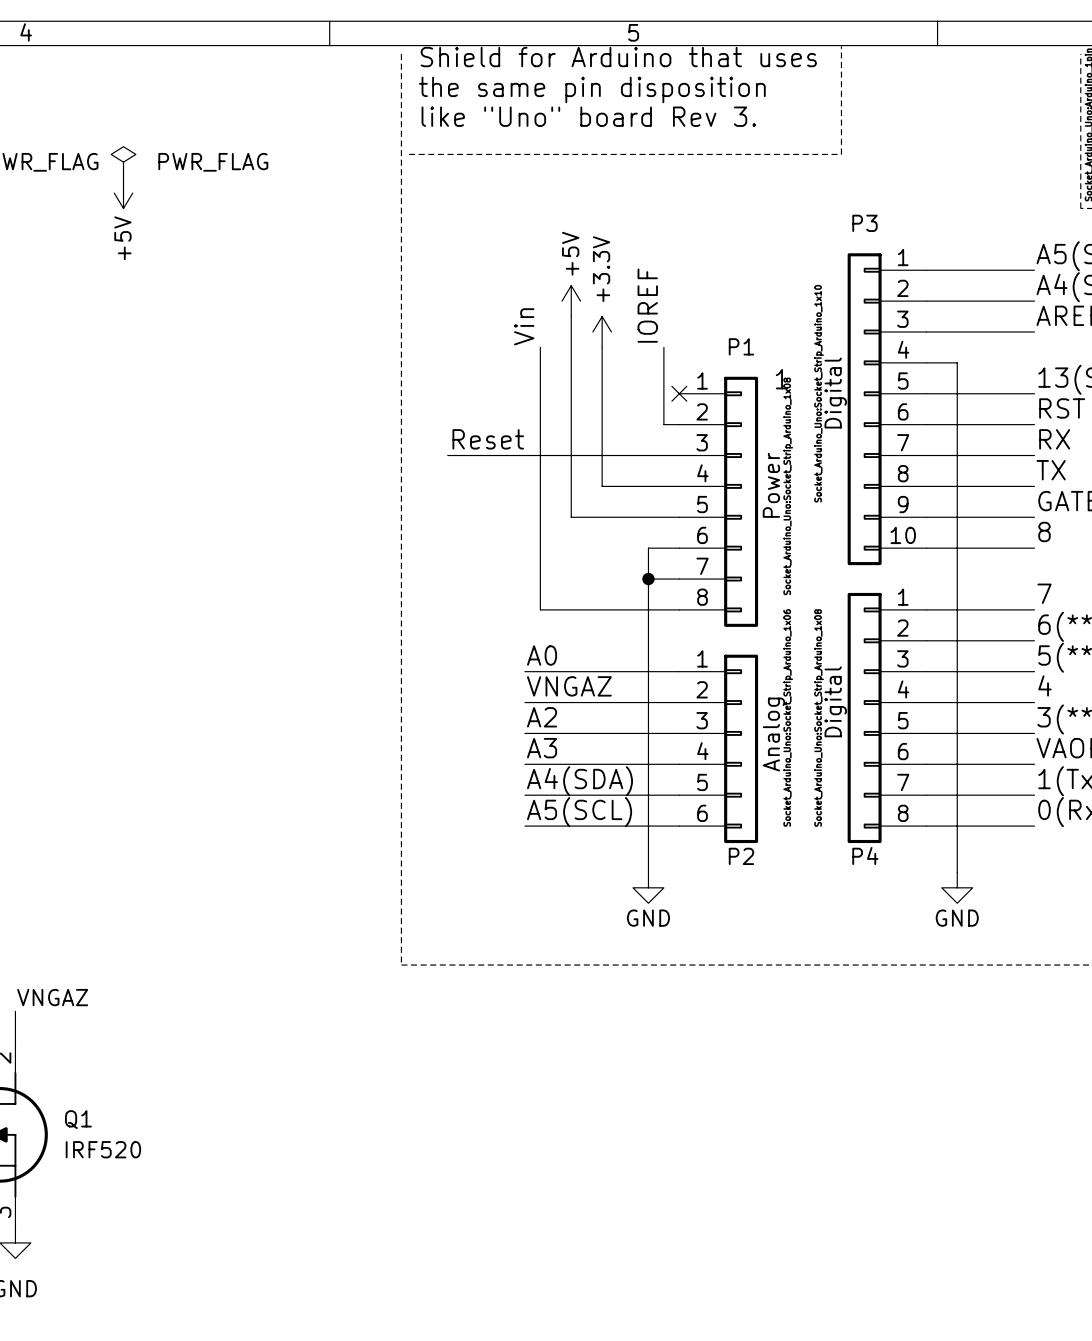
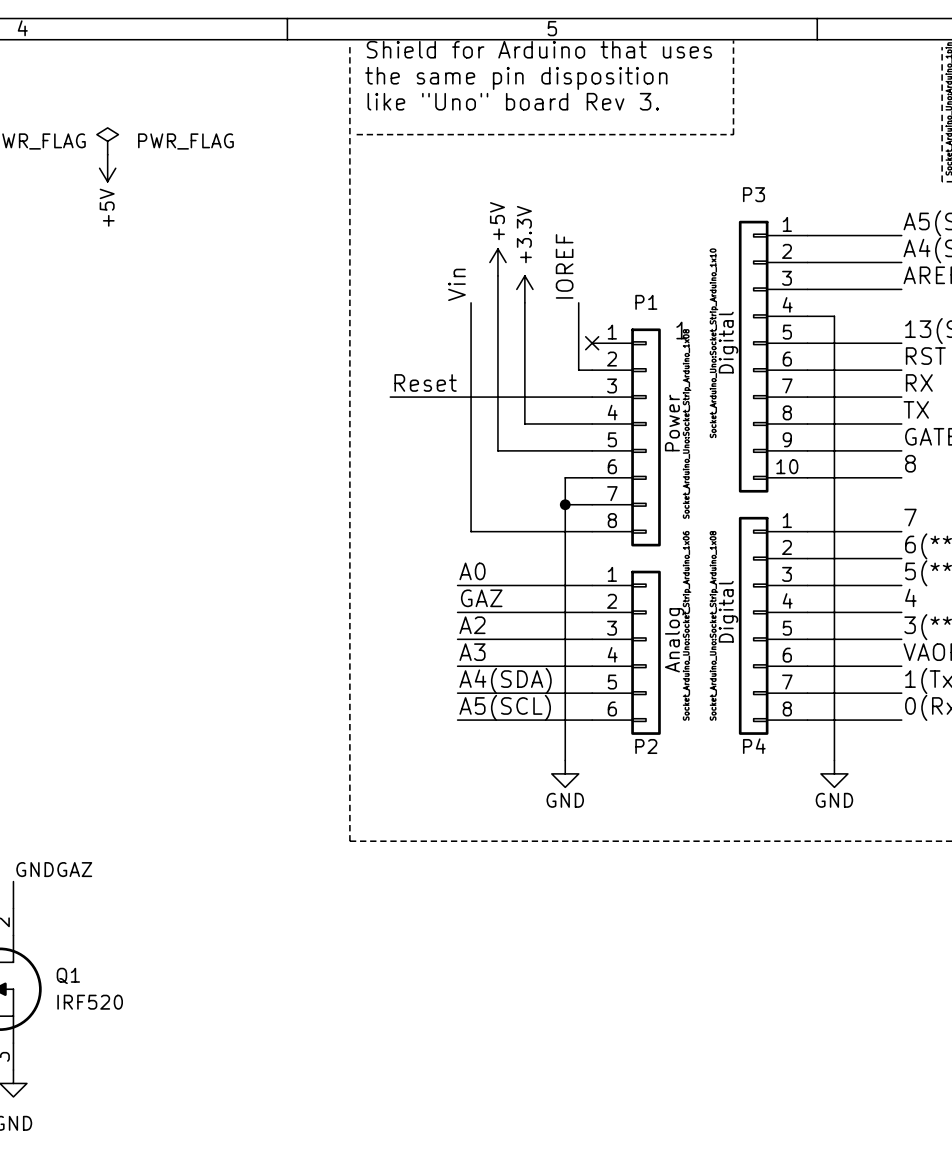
label: VNGAZ (569, 686) -> GAZ (481, 598)
label: VNGAZ (52, 997) -> GNDGAZ (54, 869)

